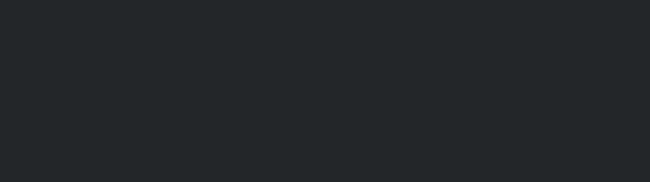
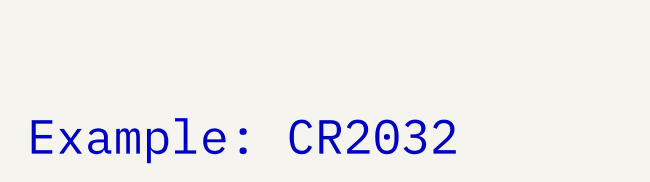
text: none -> Example: CR2032 (243, 140)

